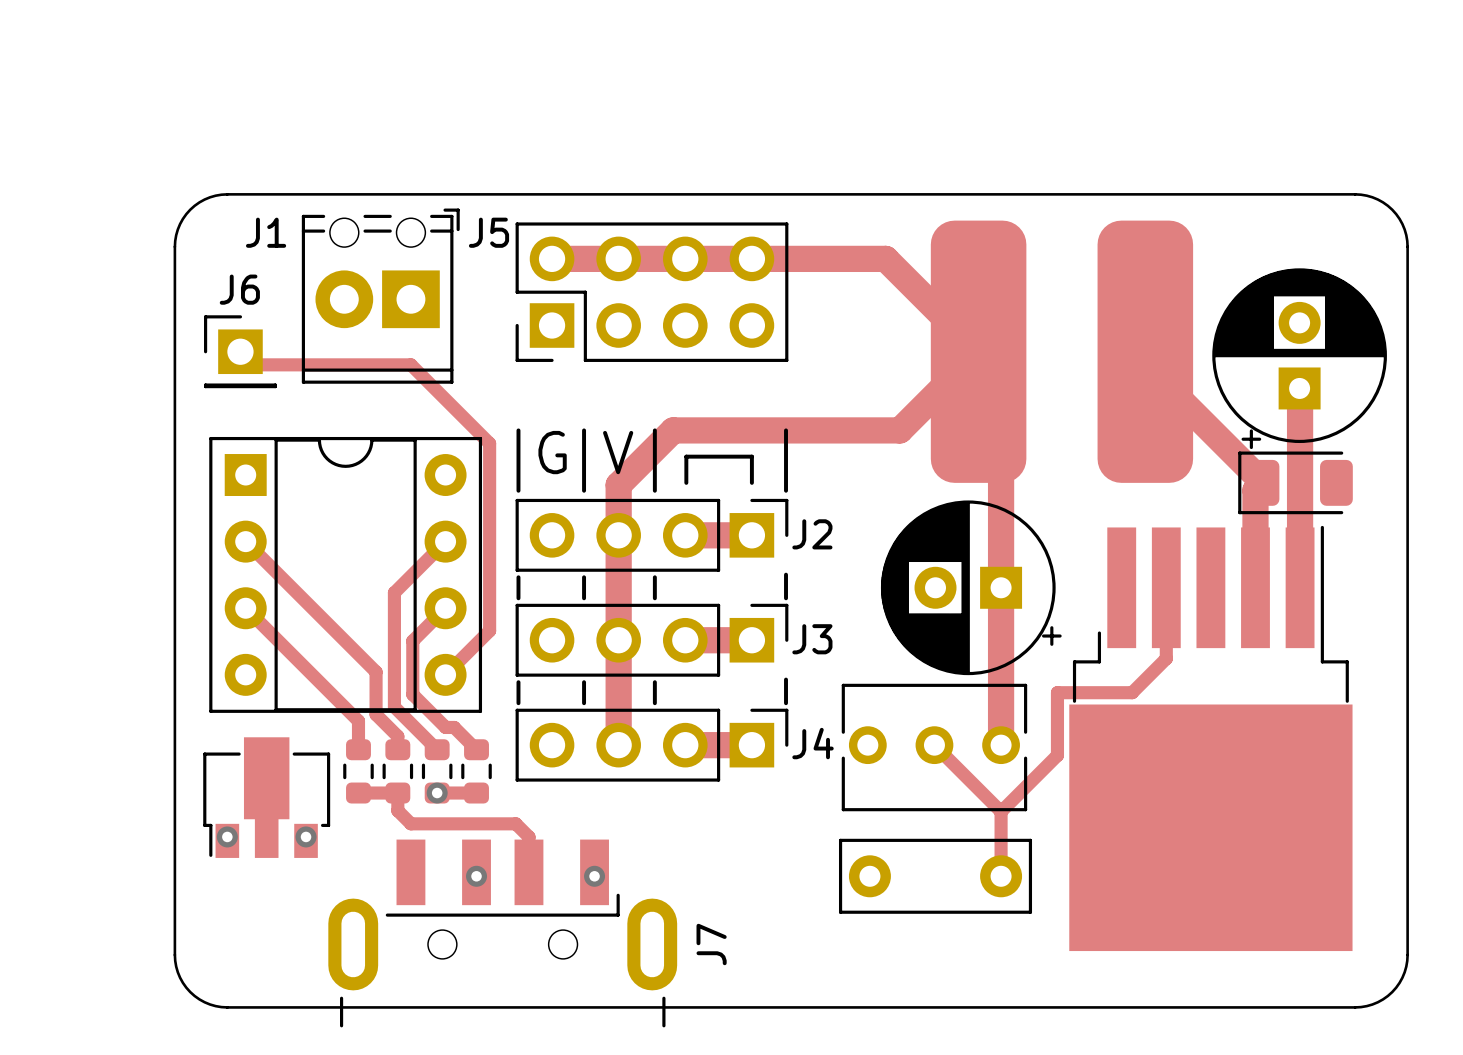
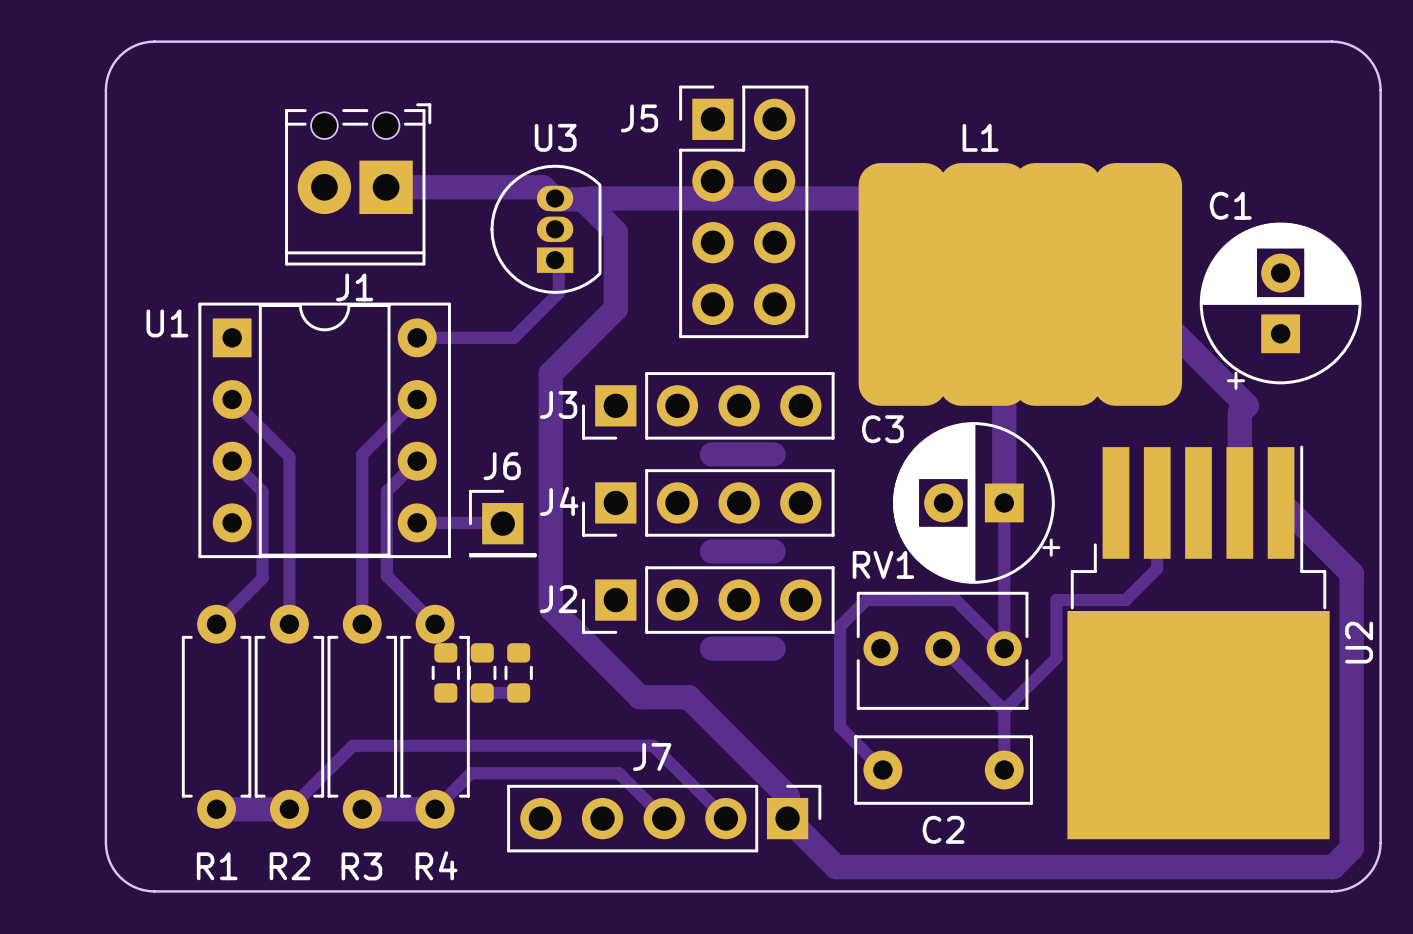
J1 name position: J1 (266, 232) -> J1 (354, 287)
J5 name position: J5 (489, 232) -> J5 (639, 118)
board edge: (1407, 246) (1404, 229) (1392, 209) (1377, 199) (1355, 194) (227, 194) (210, 197) (199, 202) (186, 214) (180, 224) (174, 246) (174, 954) (180, 977) (190, 992) (204, 1002) (227, 1007) -> (1380, 187) (1380, 90) (1377, 74) (1370, 59) (1362, 52) (1353, 46) (1337, 41) (154, 41) (143, 42) (128, 49) (113, 64) (108, 74) (105, 90) (107, 853) (110, 863) (120, 877) (133, 886) (143, 890) (288, 891)
C1 name: none -> C1 (1230, 205)
U3: none -> (545, 229)
J5 rotation: 0° (651, 292) -> 90° clockwise (743, 211)
J1 position: (380, 296) -> (358, 184)
track: none -> (558, 272) (558, 292) (513, 337) (417, 337)
track: (240, 351) (253, 364) (410, 364) (489, 443) (489, 630) (445, 674) -> none
J6 position: (240, 351) -> (502, 523)
L1: none -> (980, 284)
track: (978, 351) (899, 430) (673, 430) (618, 484) (618, 745) -> none
C1 position: (1299, 358) -> (1280, 306)
track: (1299, 388) (1300, 587) -> (386, 187) (542, 187) (555, 199) (583, 199) (615, 232) (615, 308) (550, 373) (550, 607) (640, 697) (688, 697) (787, 796) (787, 818) (836, 867) (1332, 867) (1351, 848) (1351, 573) (1281, 502)
line: (518, 430) (518, 490) -> none
line: (584, 430) (584, 490) -> none
line: (654, 430) (654, 490) -> none
line: (786, 430) (786, 490) -> none
text: G (552, 452) -> none
text: V (618, 452) -> none
track: none -> (232, 399) (289, 456) (289, 624)
track: none -> (417, 399) (362, 454) (362, 624)
line: (686, 482) (686, 456) (751, 456) (751, 482) -> none
part: (1295, 482) -> none
C3 name: none -> C3 (882, 429)
U1: none -> (324, 430)
J2 rotation: 0° (651, 535) -> 180° (708, 600)
track: (245, 541) (376, 671) (376, 714) (397, 736) (397, 749) -> none
track: (445, 541) (394, 592) (394, 706) (437, 749) -> none
track: none -> (232, 461) (262, 491) (262, 578) (216, 624)
track: none -> (417, 461) (386, 491) (386, 575) (435, 624)
part: (345, 574) -> none
line: (786, 574) (786, 598) -> none
line: (518, 577) (518, 598) -> none
line: (584, 577) (584, 598) -> none
line: (654, 577) (654, 598) -> none
track width: thick (1001, 587) (1001, 745) -> thin (1004, 502) (1004, 648)
track: (245, 608) (358, 721) (358, 749) -> none
track: (445, 608) (412, 641) (412, 694) (445, 727) (454, 727) (476, 749) -> none
track: none -> (417, 522) (501, 522)
J3 rotation: 0° (651, 640) -> 180° (708, 405)
RV1 name: none -> RV1 (883, 564)
line: (786, 679) (786, 703) -> none
line: (518, 682) (518, 703) -> none
line: (584, 682) (584, 703) -> none
line: (654, 682) (654, 703) -> none
U2 name: none -> U2 (1359, 642)
J4 rotation: 0° (651, 745) -> 180° (708, 502)
track: none -> (1004, 648) (955, 600) (866, 600) (840, 626) (840, 727) (882, 770)
part: (358, 771) -> none
track: (358, 793) (397, 793) (397, 810) (410, 823) (515, 823) (528, 836) (528, 872) -> none
via: (437, 793) -> none
part: (266, 797) -> none
R1: none -> (216, 716)
R2: none -> (289, 716)
R3: none -> (362, 716)
R4: none -> (435, 716)
via: (227, 836) -> none
via: (306, 836) -> none
J7 footprint: [328, 839, 678, 1028] -> [507, 784, 822, 853]
via: (476, 876) -> none
via: (594, 876) -> none
track: none -> (216, 809) (289, 809) (352, 745) (653, 745) (725, 818)
track: none -> (362, 809) (435, 809) (471, 773) (618, 773) (664, 818)
C2 name: none -> C2 (943, 829)
J7 name position: J7 (711, 944) -> J7 (652, 756)

